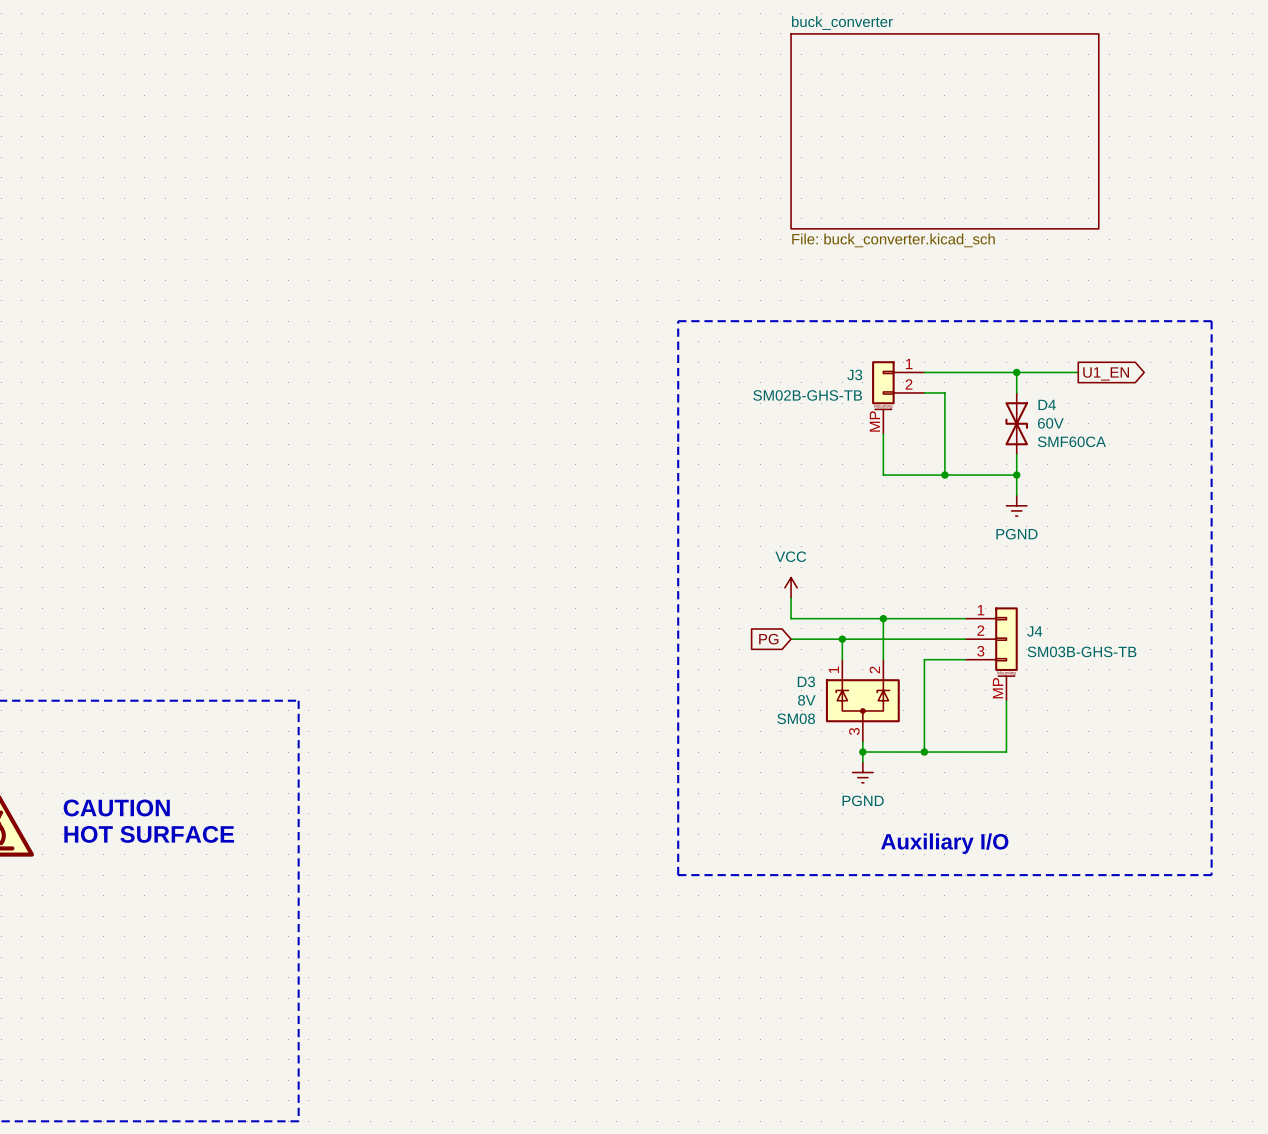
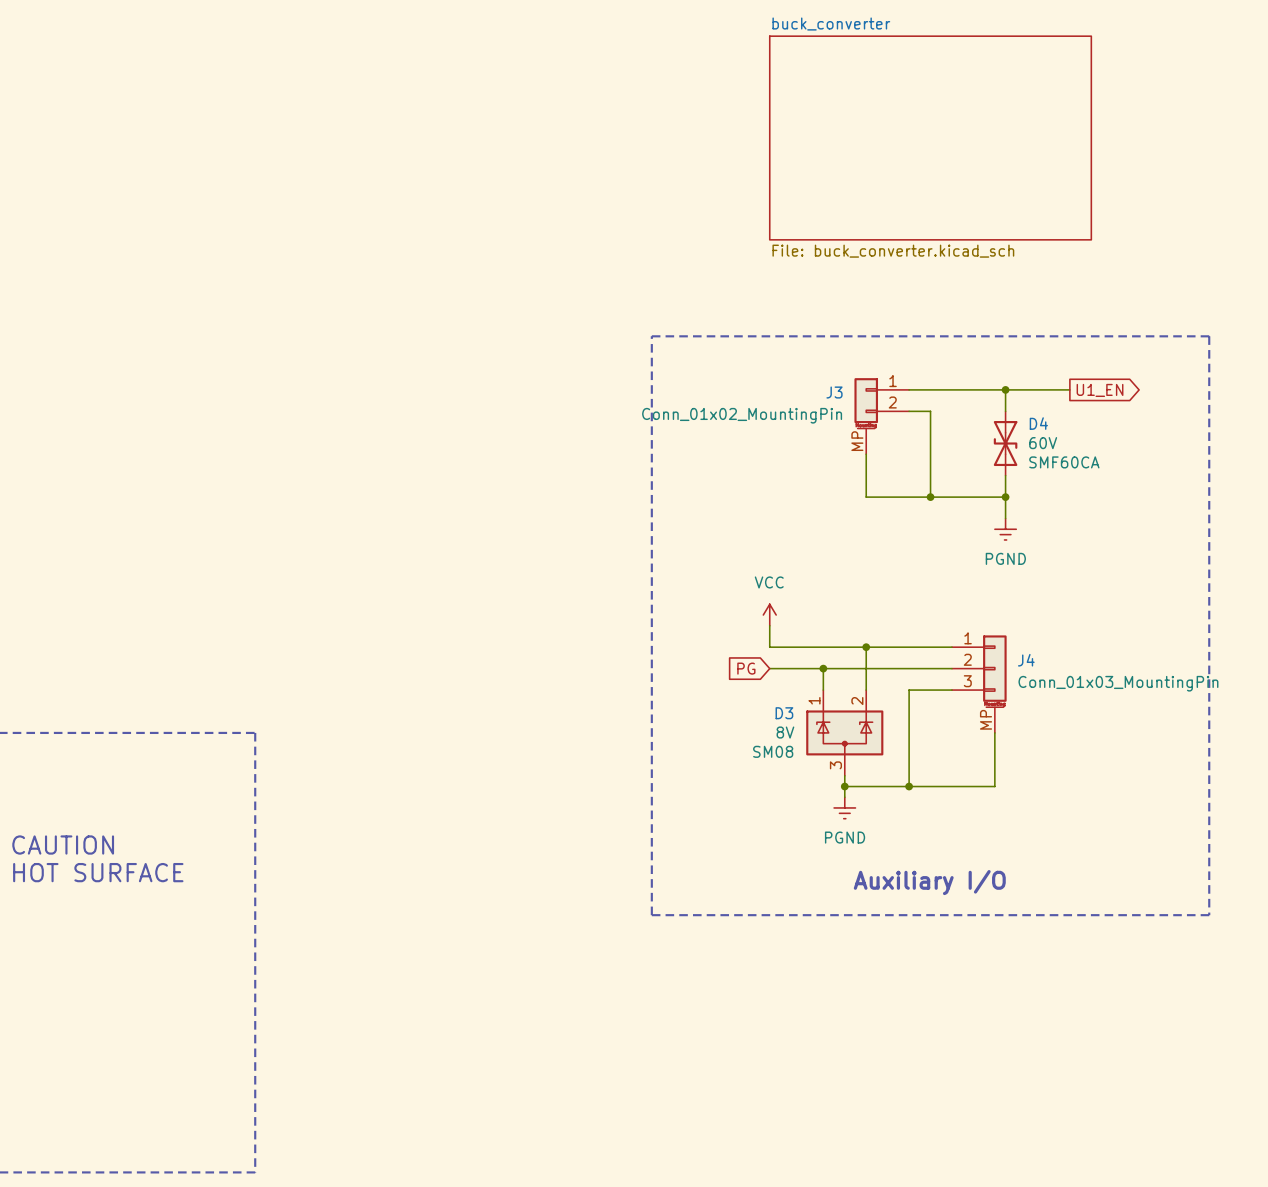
J3 value: SM02B-GHS-TB (807, 395) -> Conn_01x02_MountingPin (742, 415)
J4 value: SM03B-GHS-TB (1082, 651) -> Conn_01x03_MountingPin (1118, 683)

